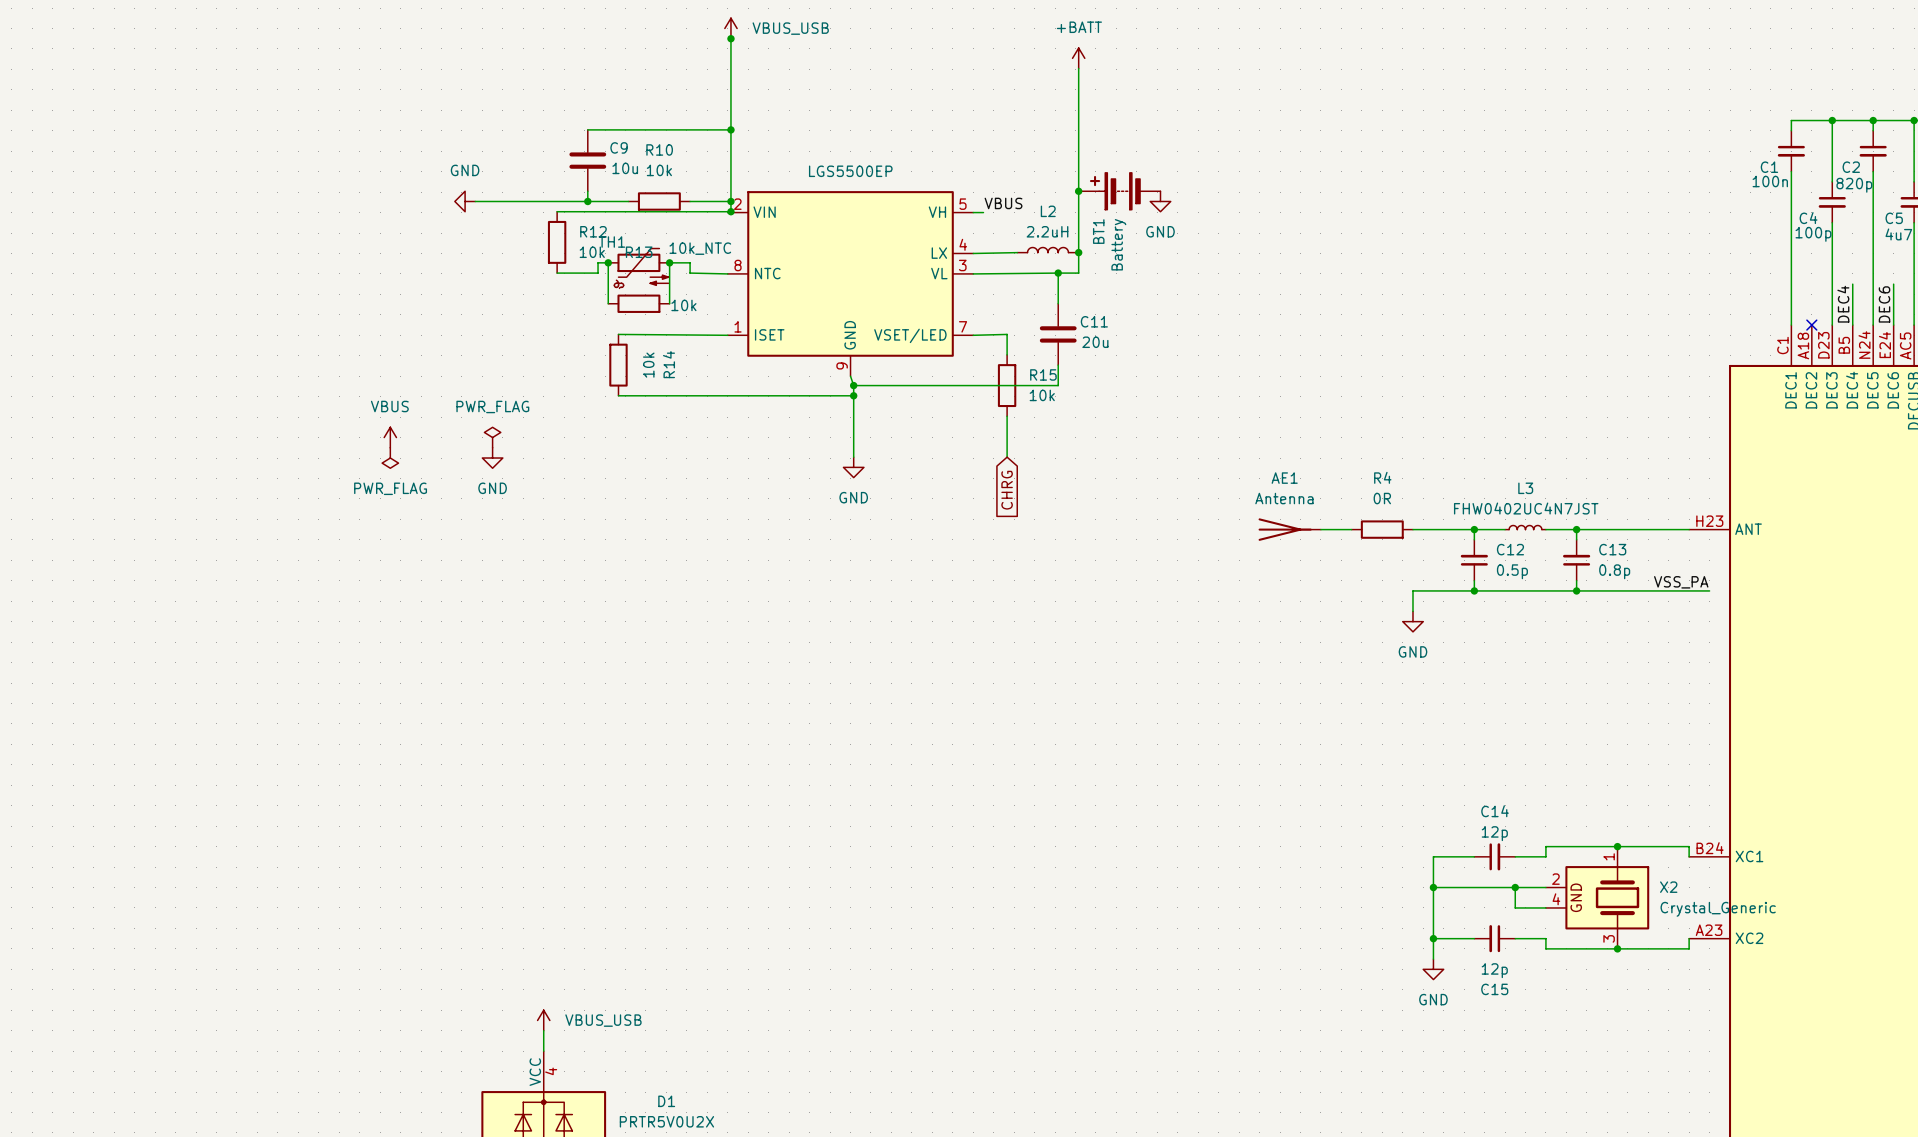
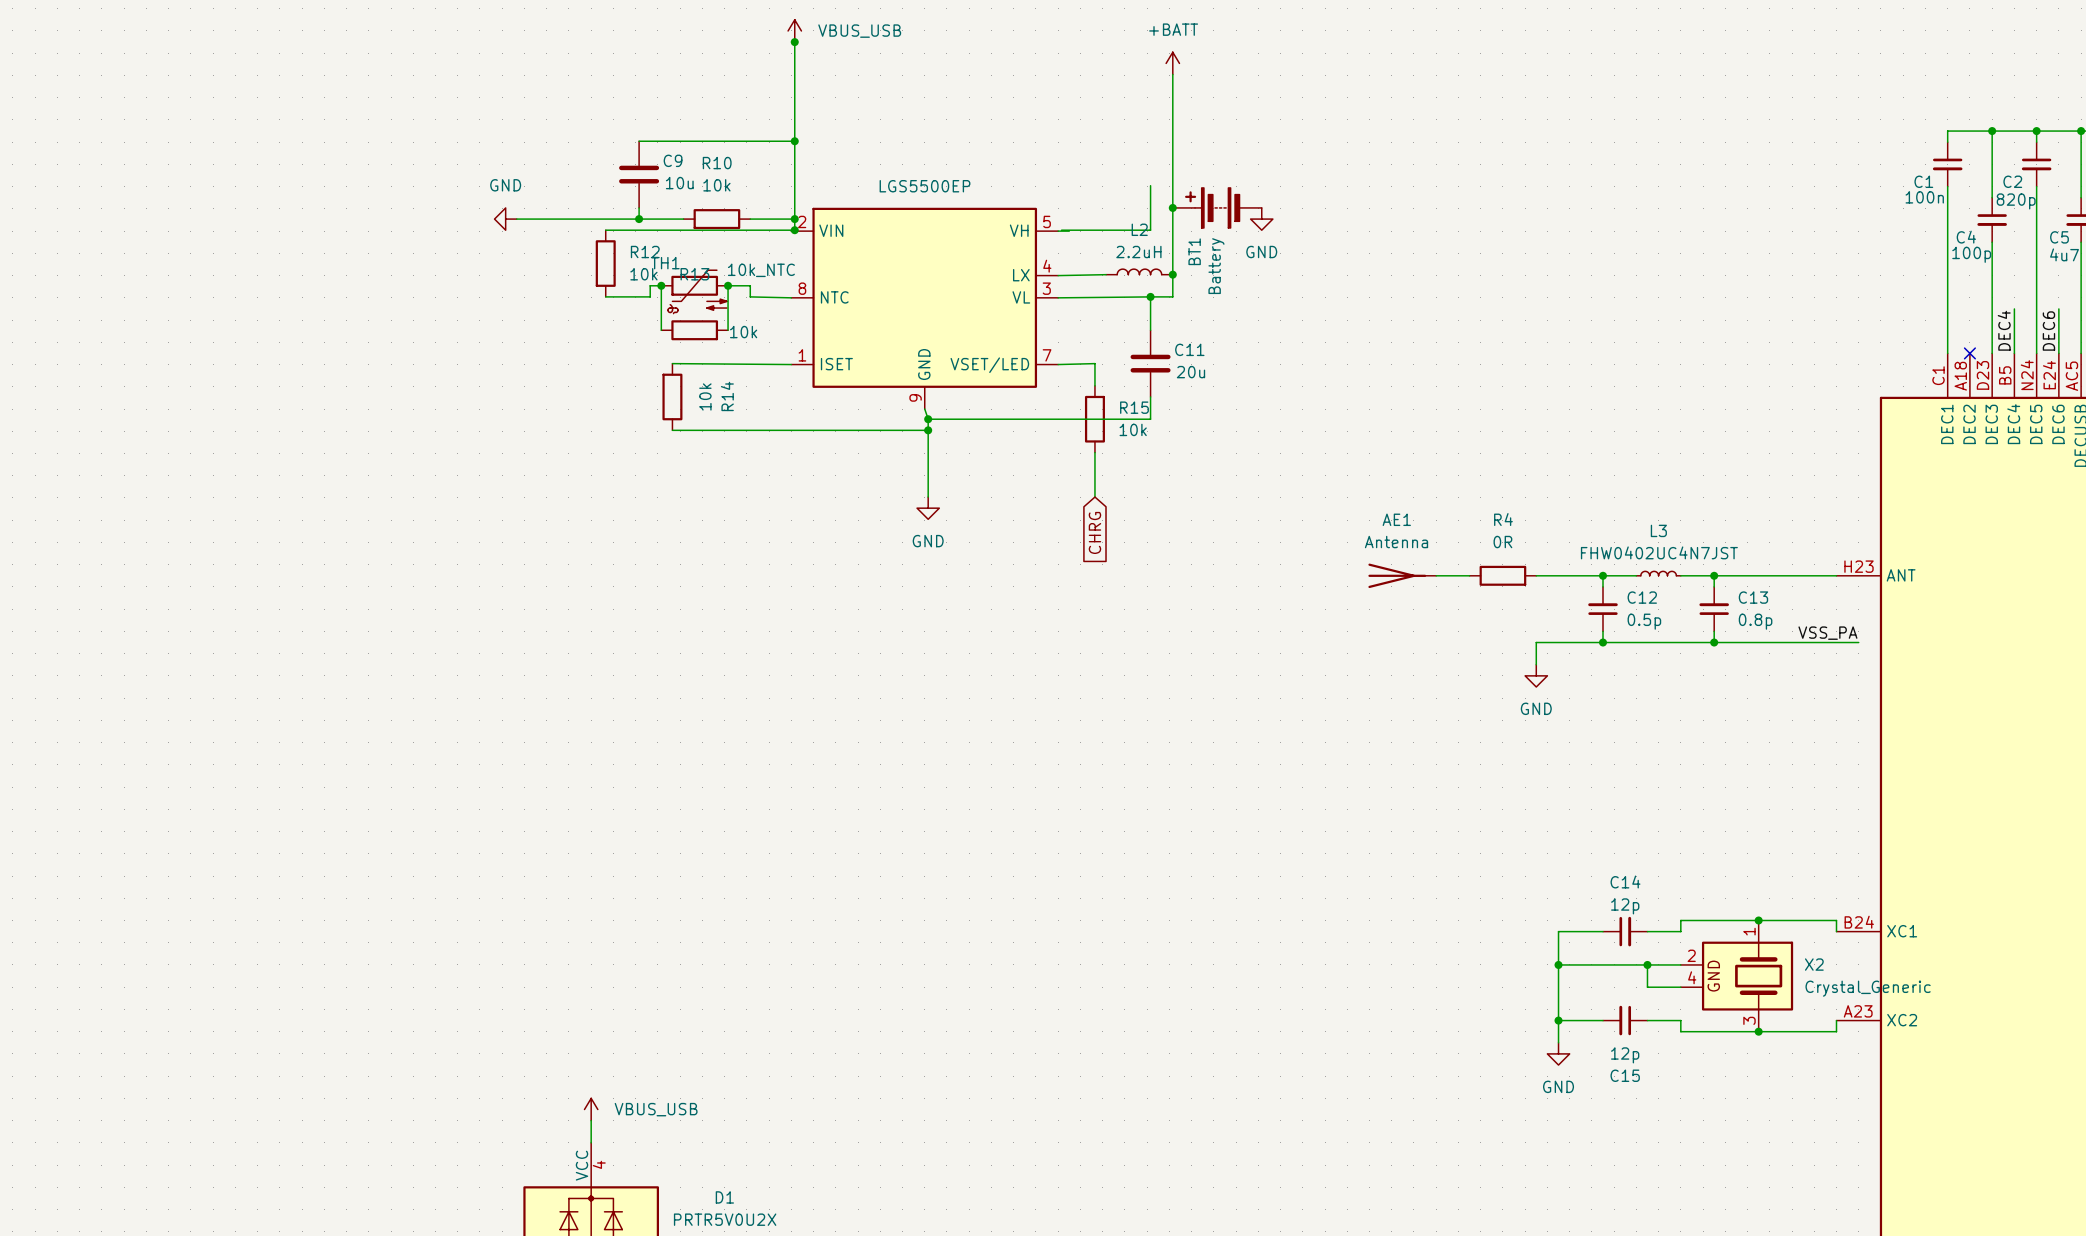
wire: none -> (1150, 185) (1150, 230) (1061, 230)
label: VBUS (1003, 203) -> none
power symbol: VBUS (390, 437) -> none
power symbol: PWR_FLAG (492, 437) -> none
power symbol: PWR_FLAG (390, 458) -> none
power symbol: GND (492, 458) -> none

